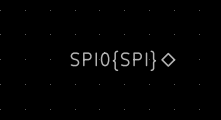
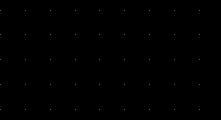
hierarchical label: SPI0{SPI} (113, 60) -> none

